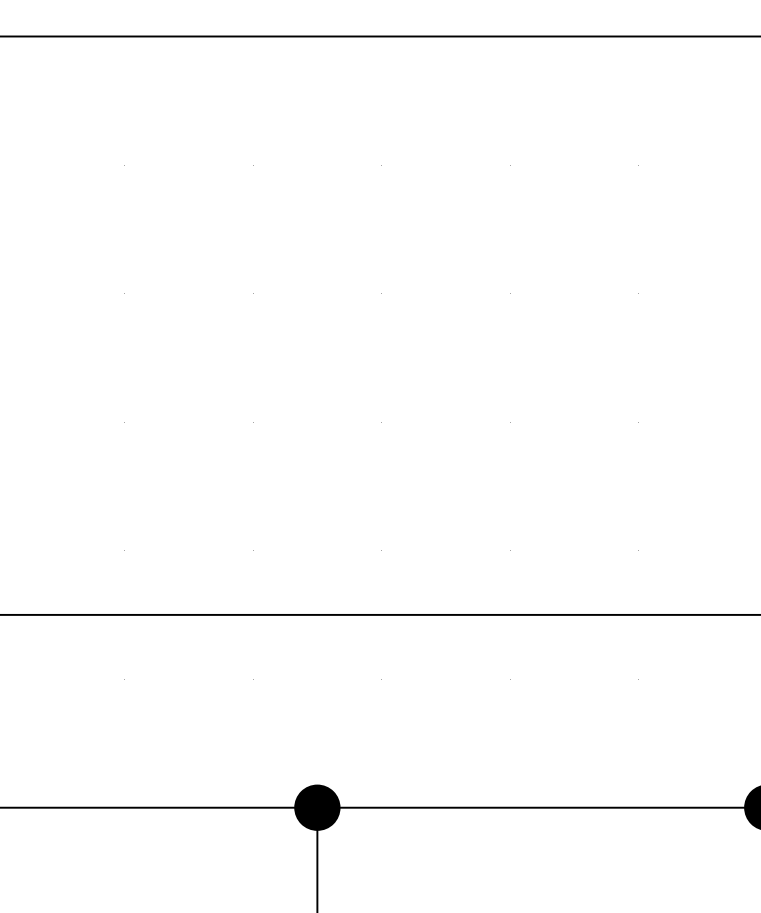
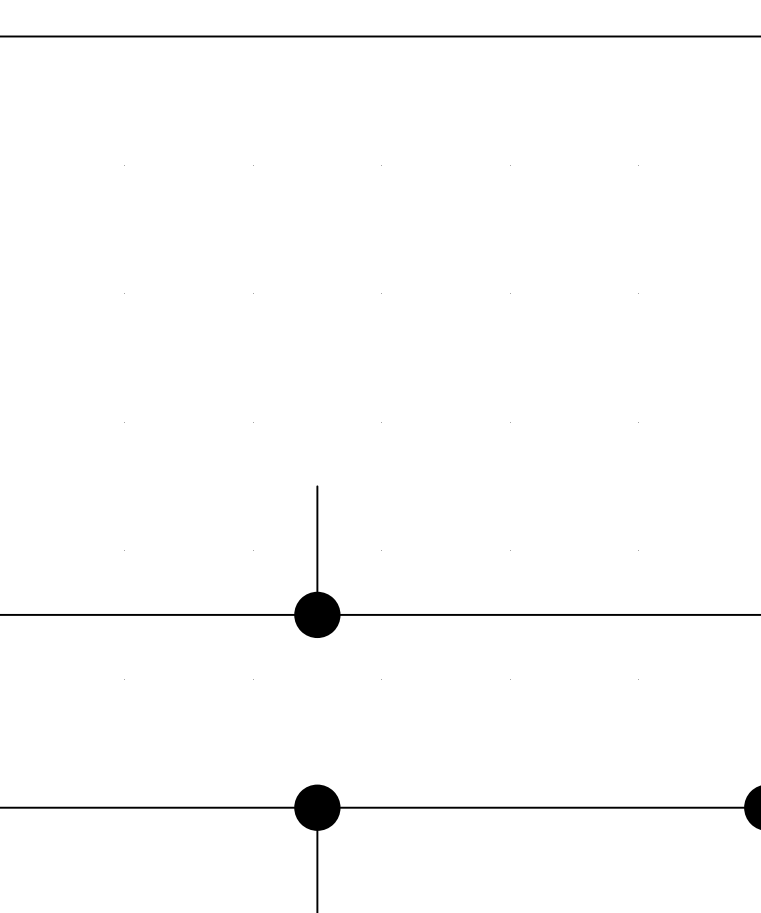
wire: none -> (317, 486) (317, 614)
junction: none -> (317, 614)

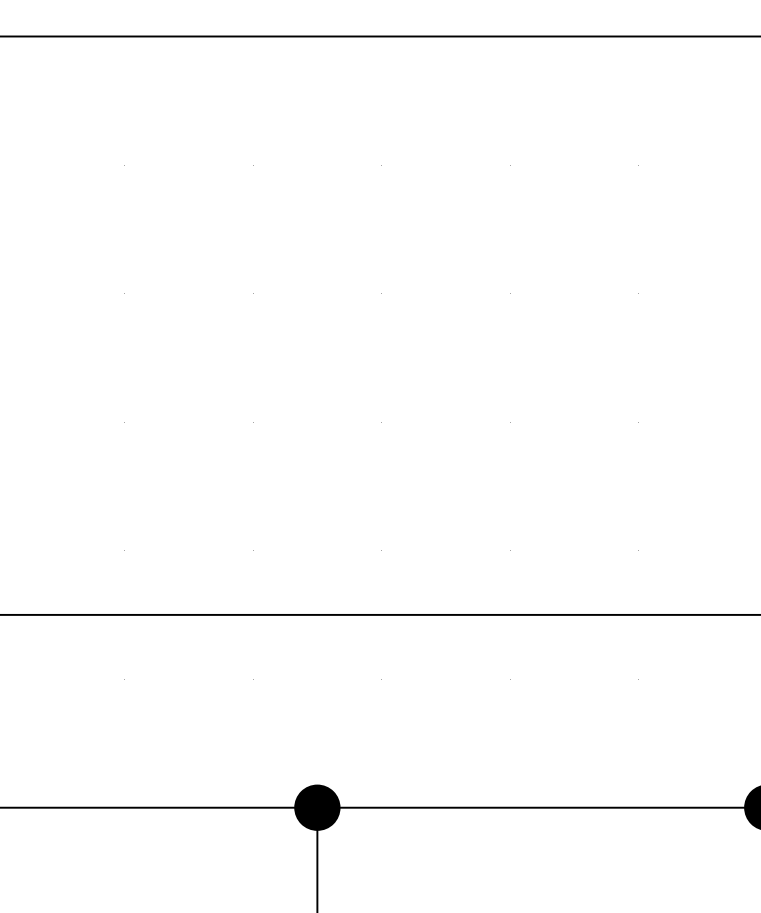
wire: (317, 486) (317, 614) -> none
junction: (317, 614) -> none

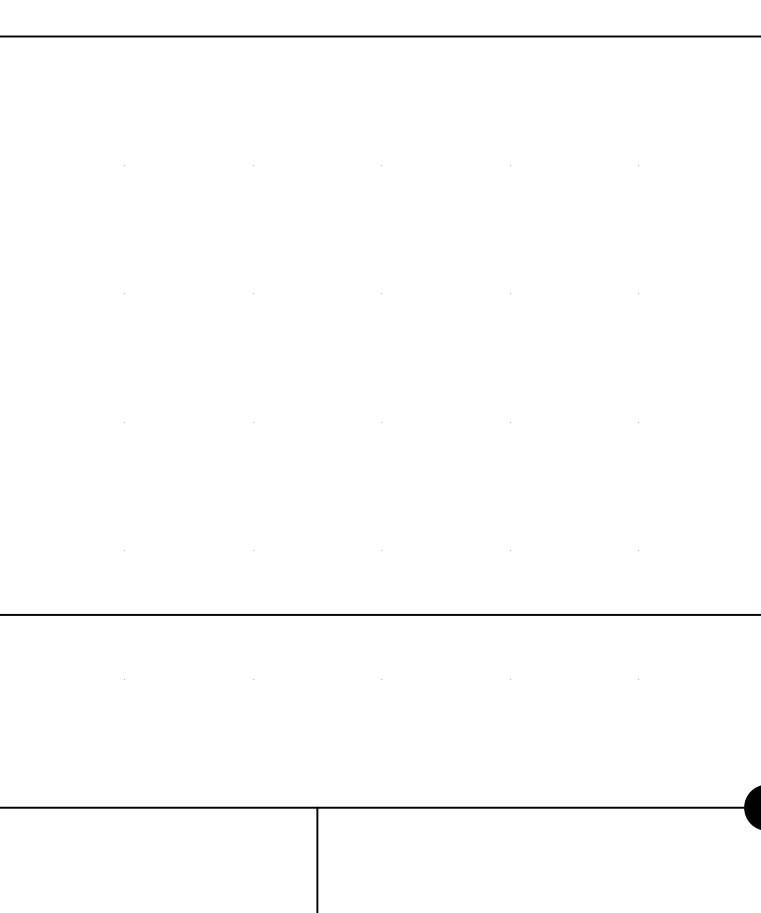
junction: (317, 807) -> none

